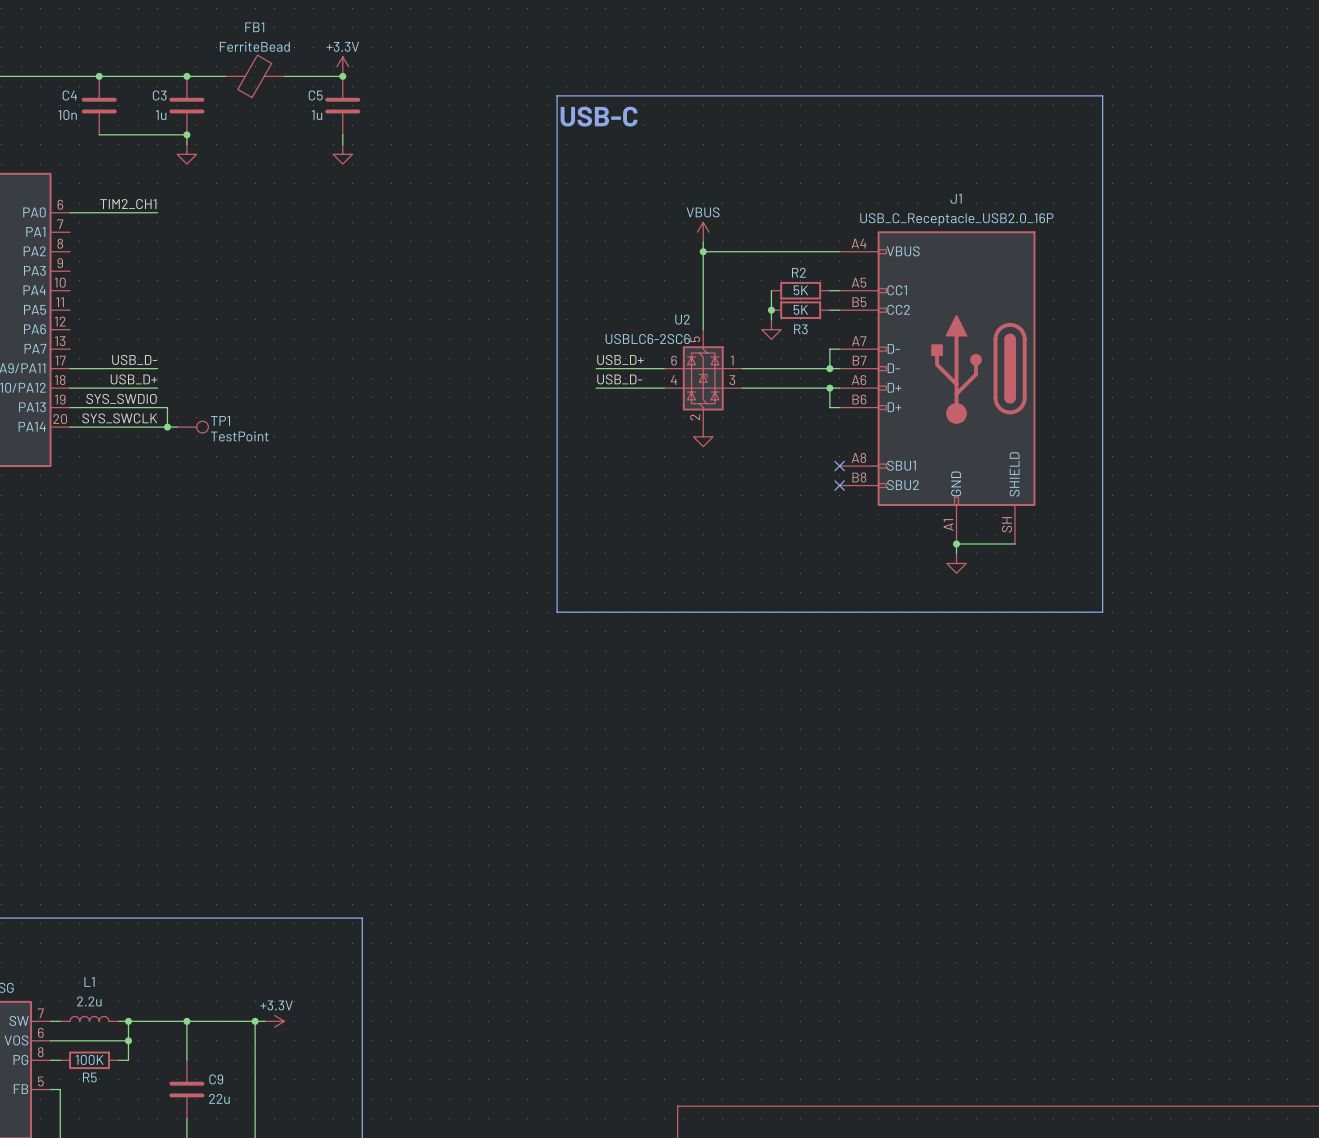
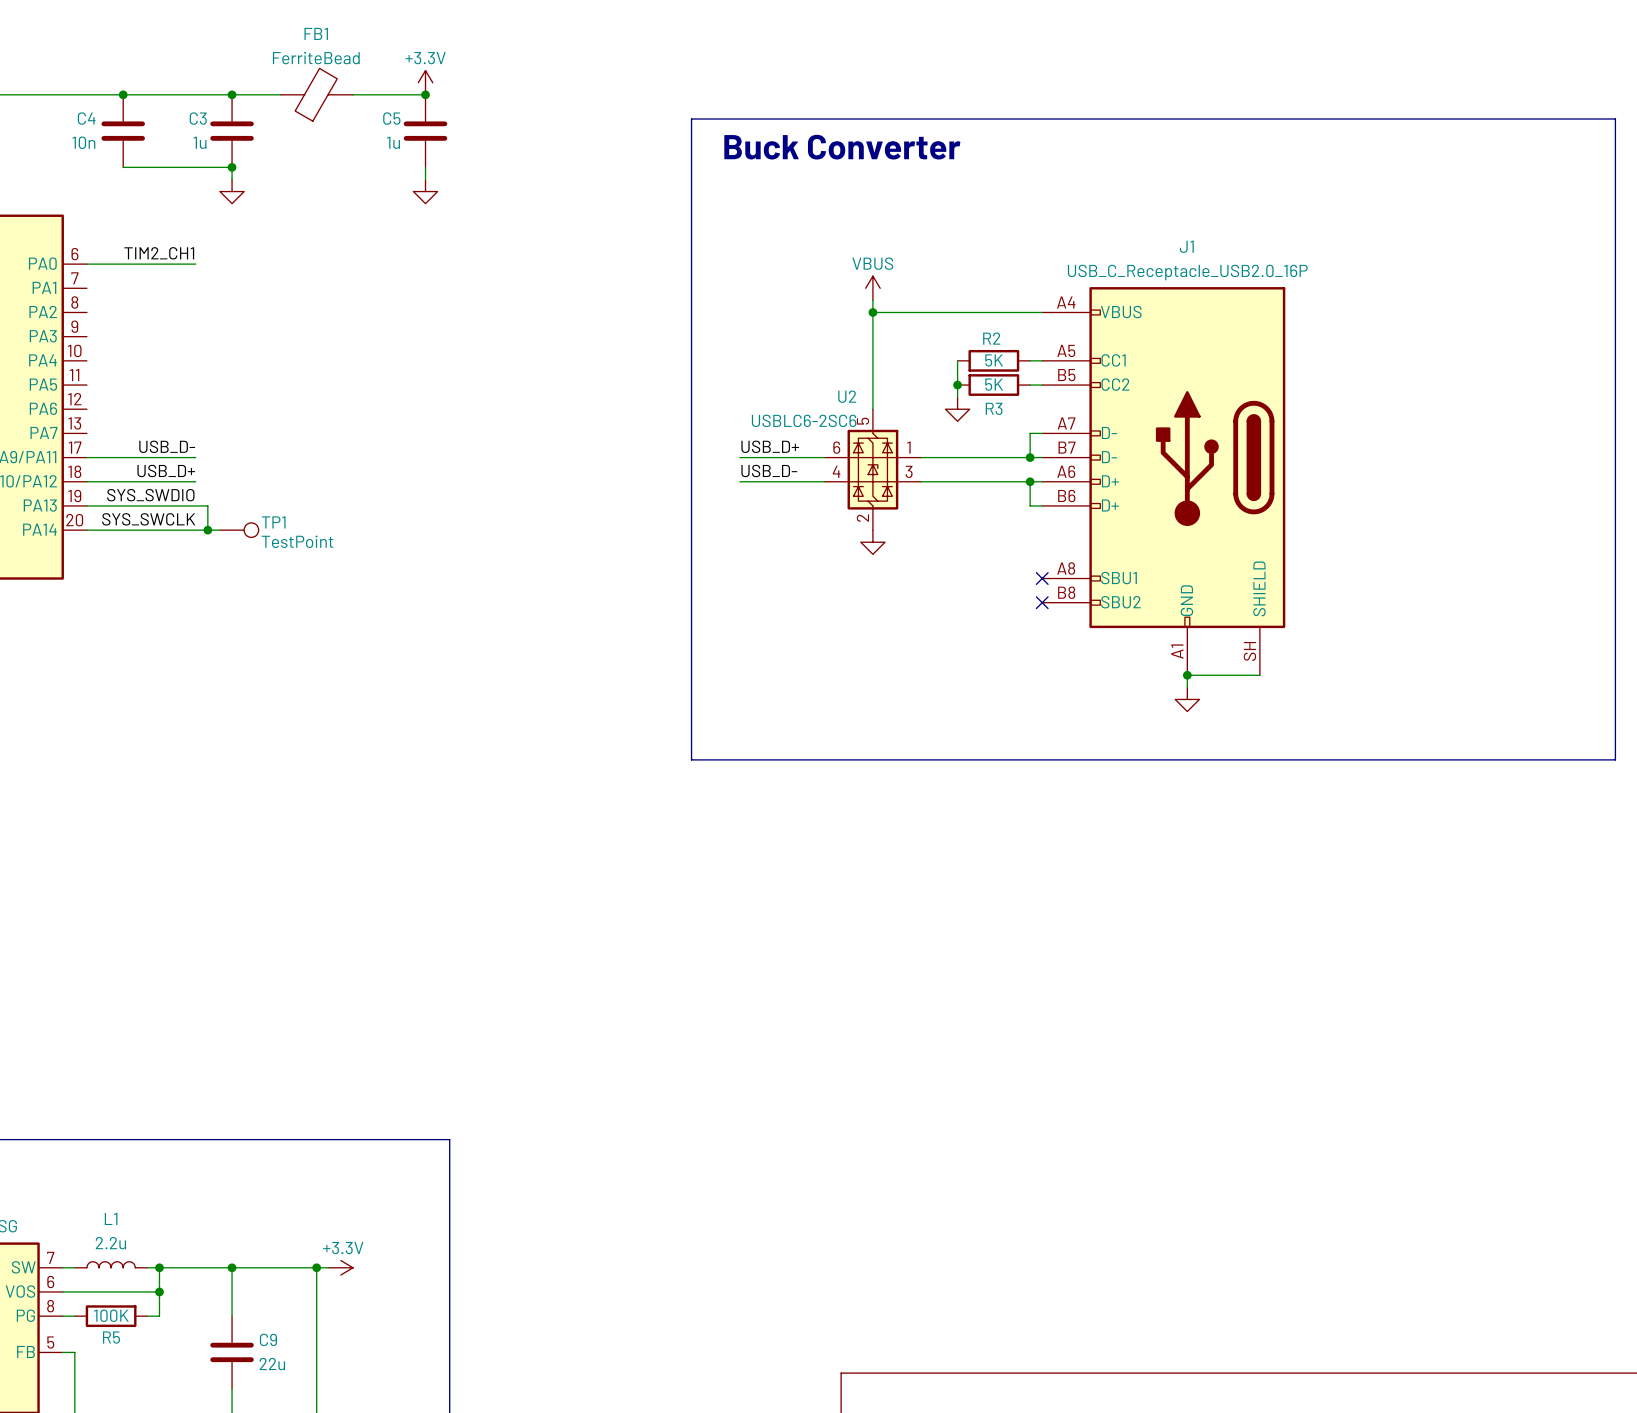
line: (1102, 95) (1102, 612) -> (1368, 119) (1615, 119) (1615, 759) (1368, 759)
text: USB-C (599, 116) -> none
text: none -> Buck Converter (842, 147)

